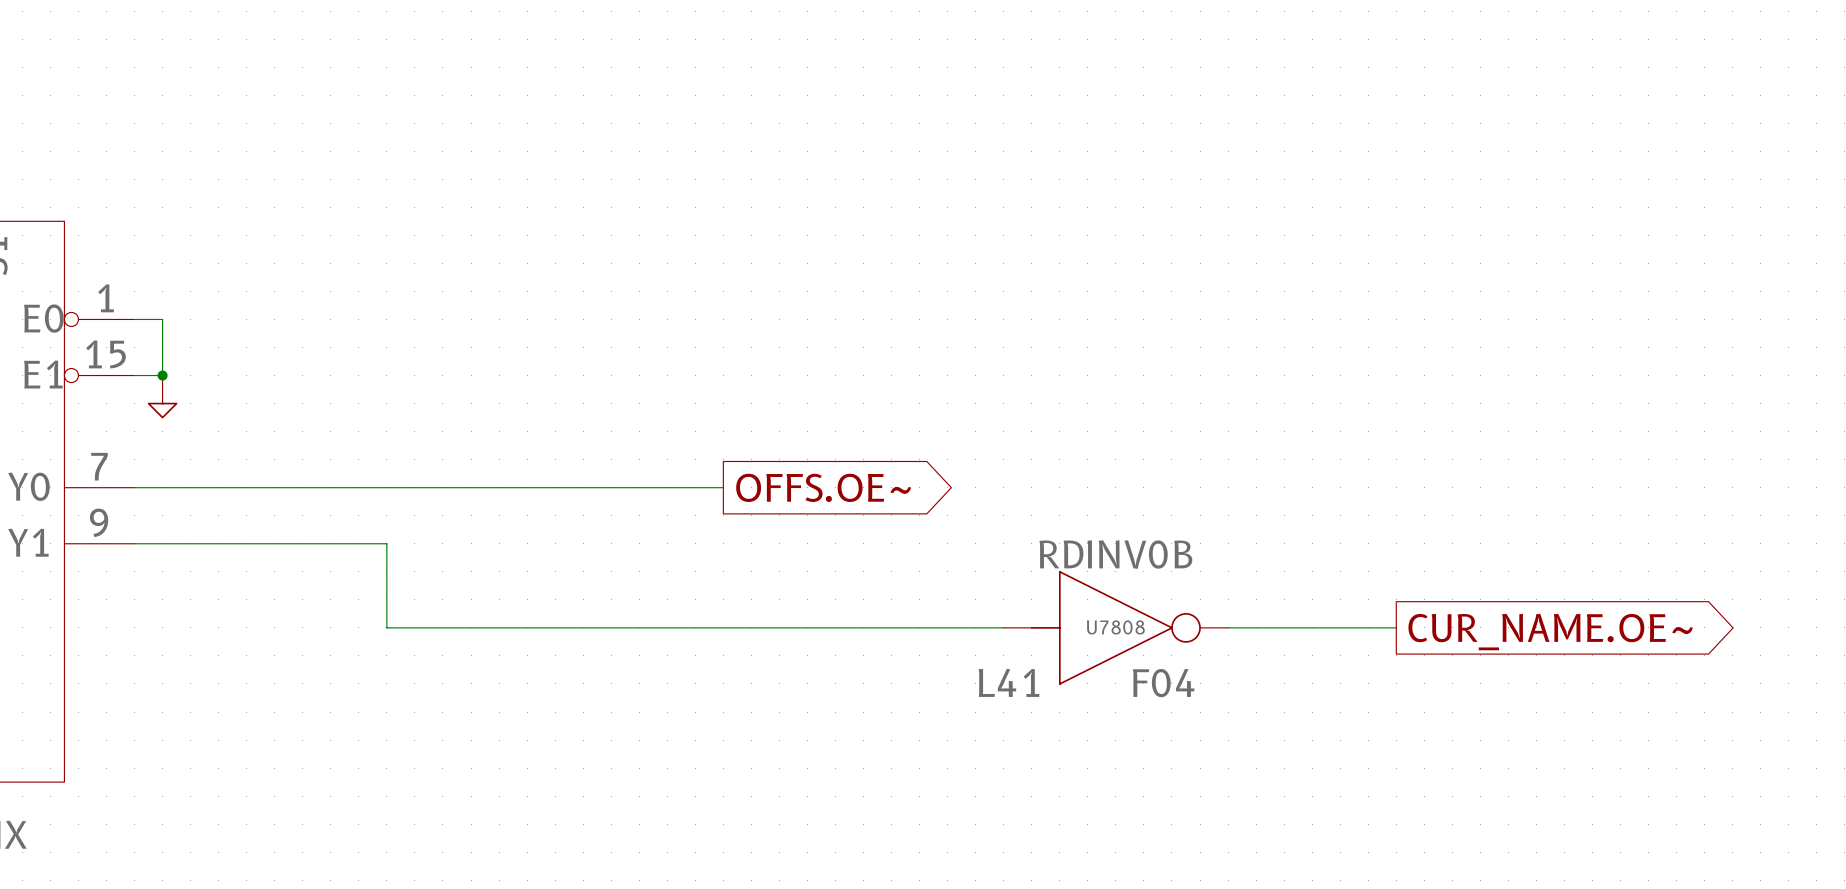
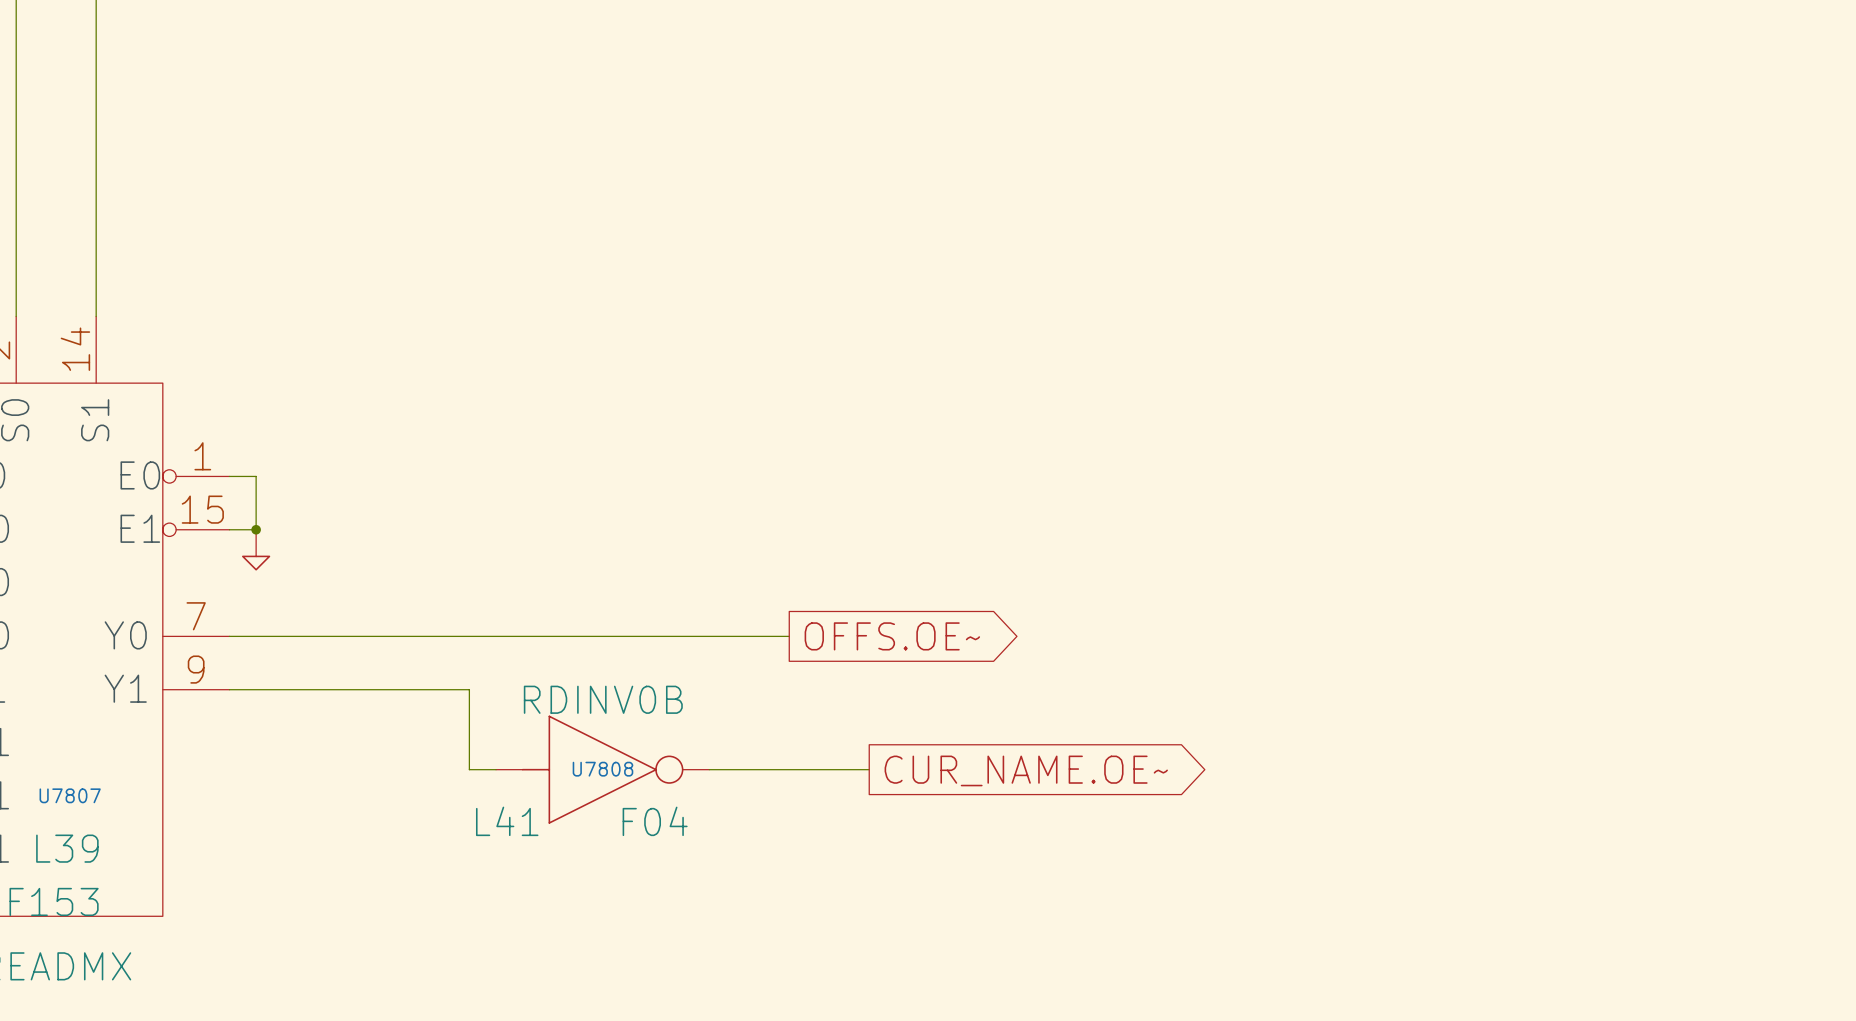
wire: (414, 627) (639, 627) -> none
wire: (807, 627) (1003, 627) -> none
U7808 position: (1115, 627) -> (602, 769)
wire: (1228, 627) (1396, 627) -> none
global label: none -> CUR_NAME.OE~ (1026, 770)
global label: CUR_NAME.OE~ (1550, 632) -> none

